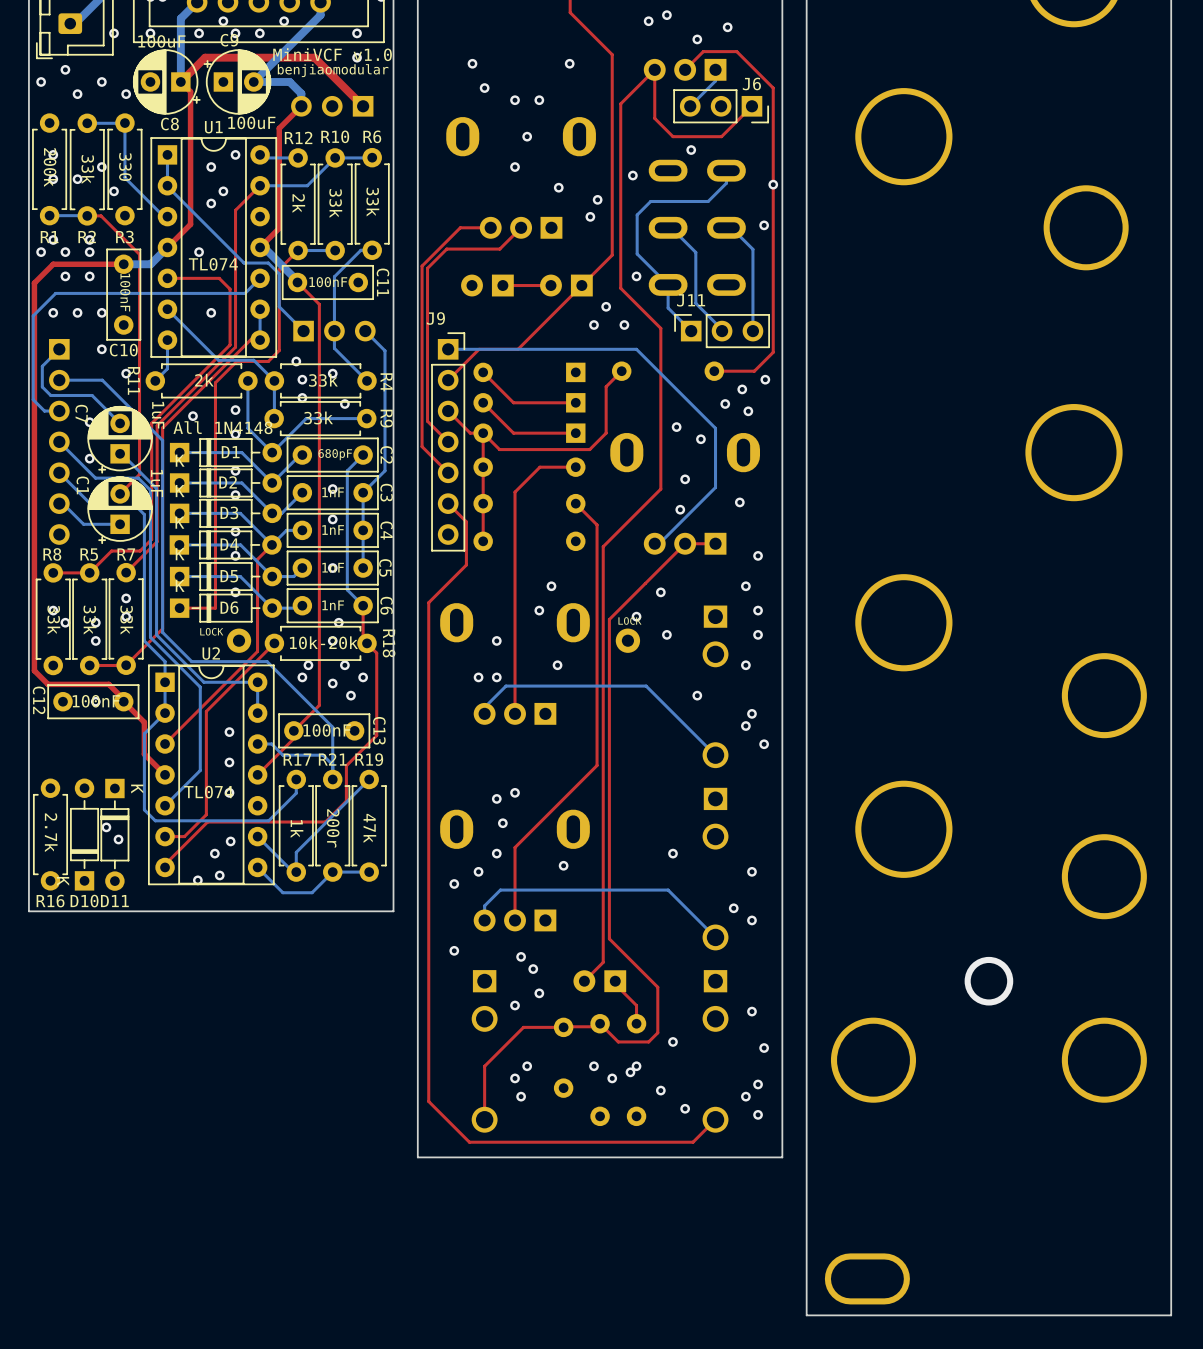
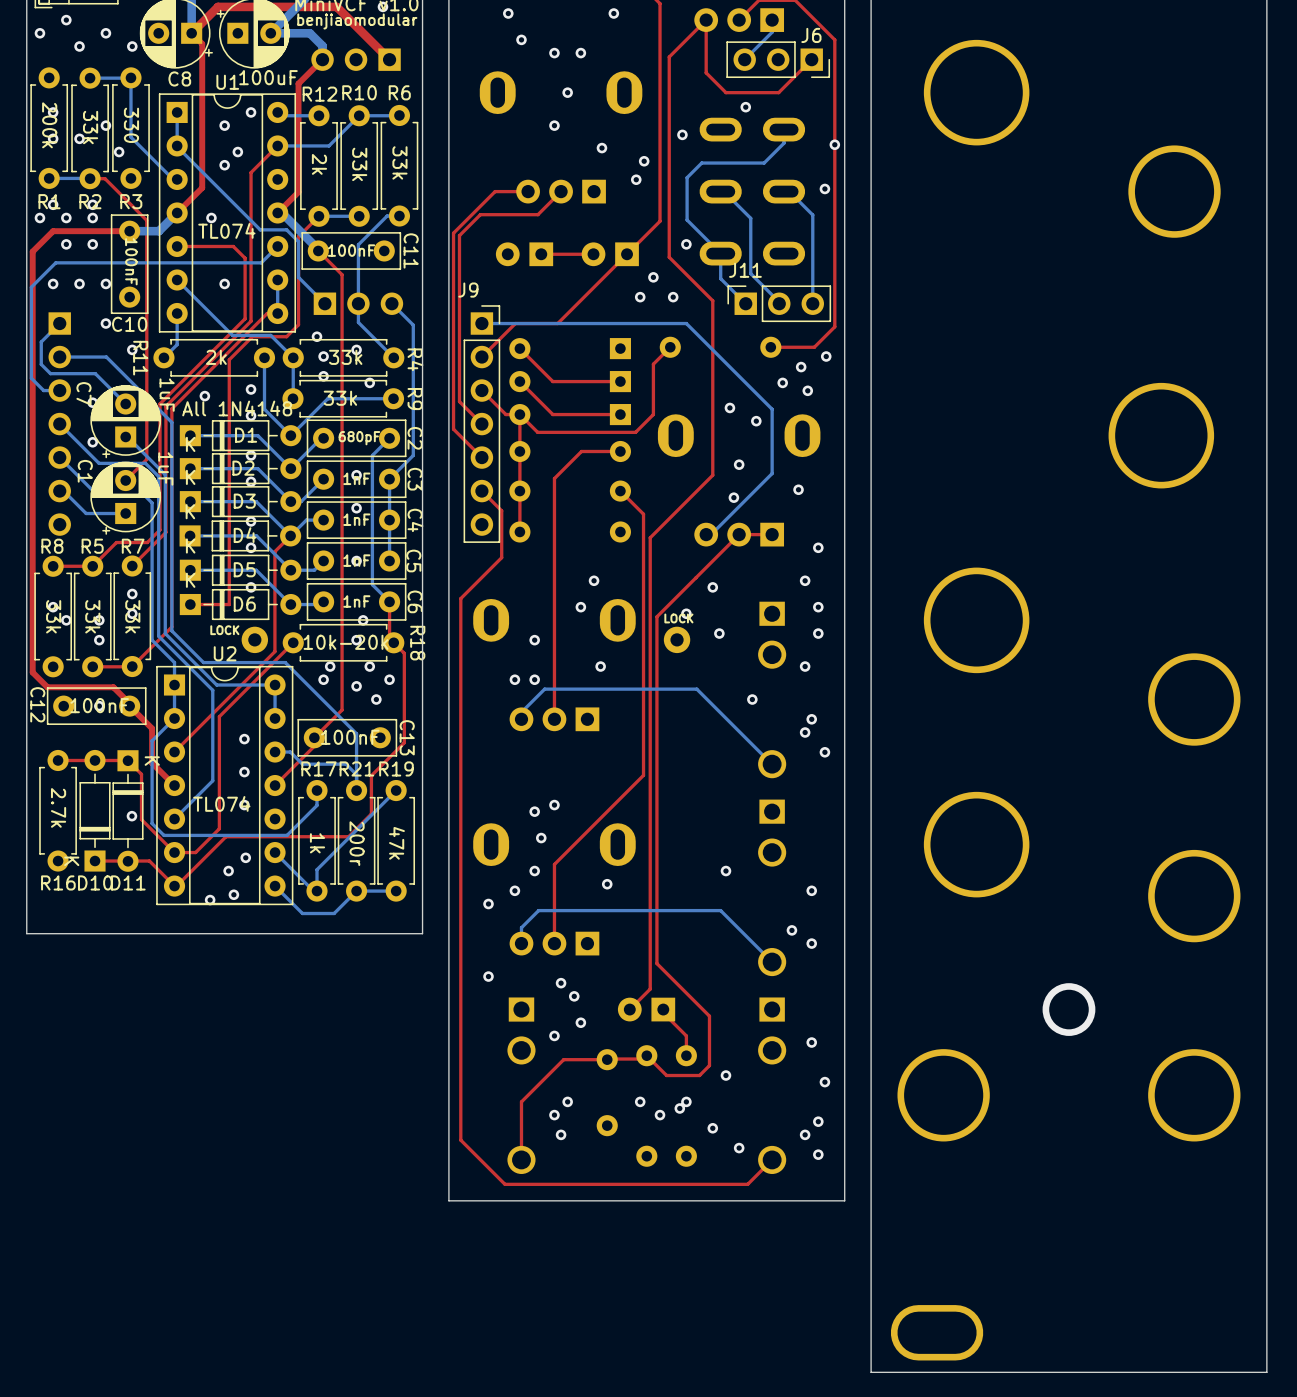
top track: none -> (129, 760) (58, 760)
top track: none -> (127, 760) (141, 774) (141, 819) (174, 852)
via: none -> (131, 816)
top track: (212, 822) (207, 822) (165, 864) (165, 867) -> (225, 836) (176, 886) (149, 861) (95, 861)
via: (106, 827) -> none
R16 position: (50, 834) -> (58, 810)
D10 position: (84, 834) -> (95, 810)
D11 position: (114, 834) -> (127, 811)
via: (118, 839) -> none

